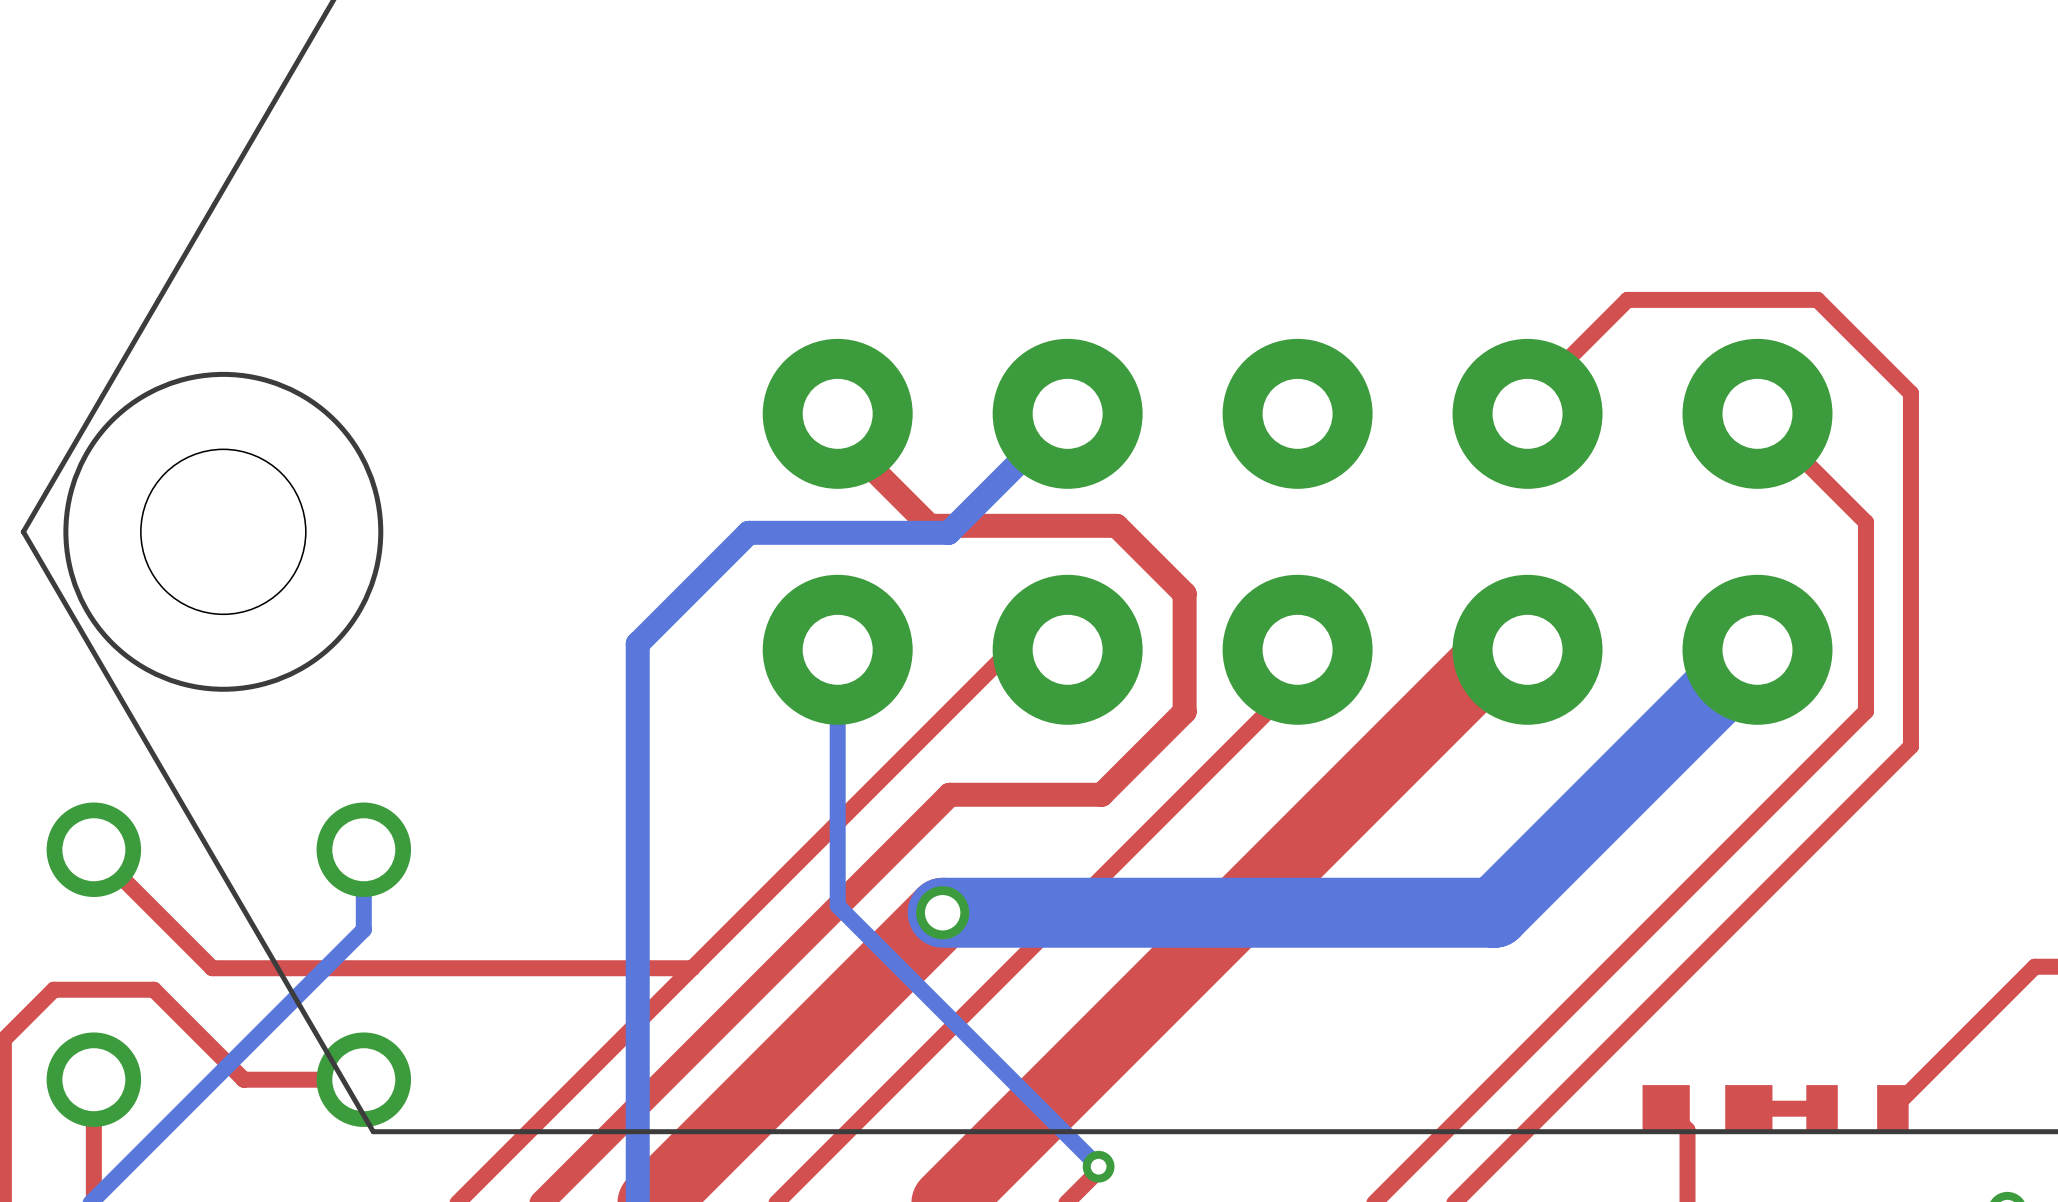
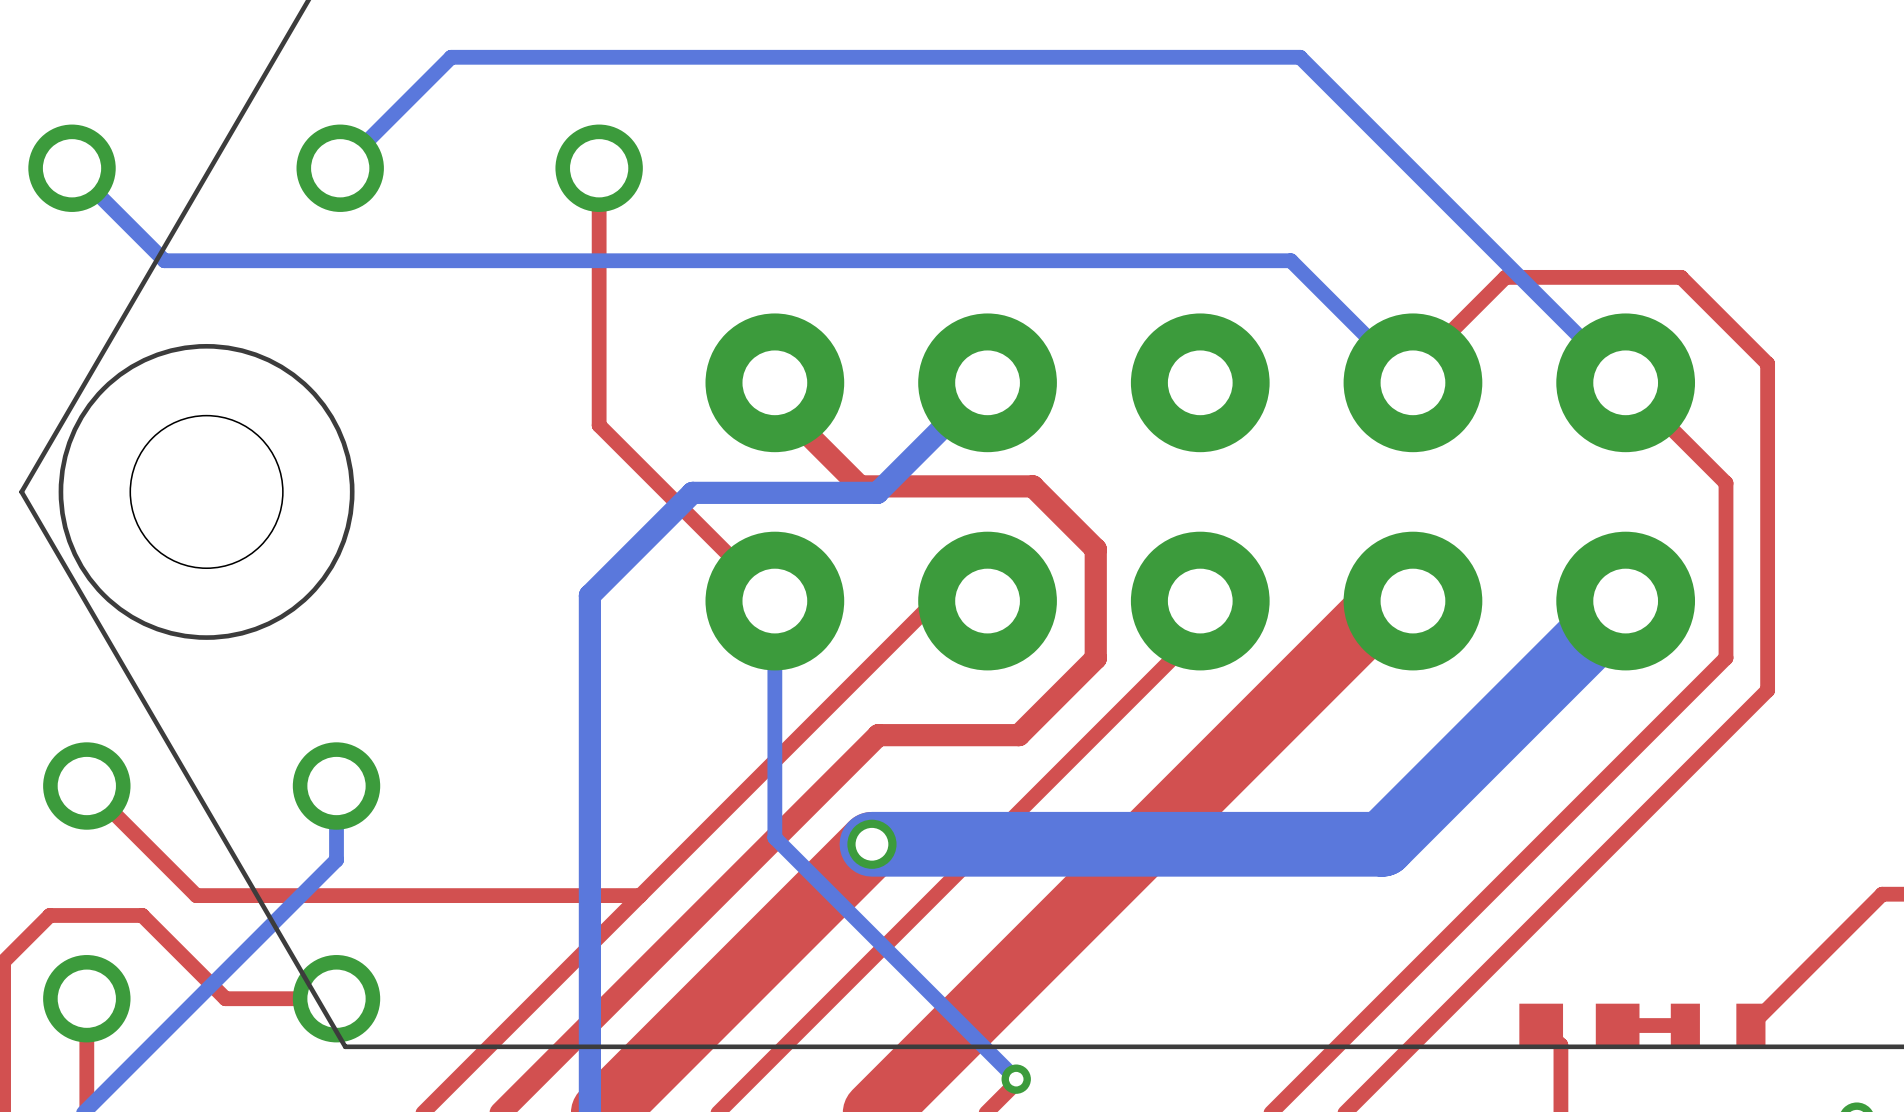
bottom track: none -> (72, 168) (164, 260) (1290, 260) (1412, 382)
part: none -> (72, 168)
bottom track: none -> (340, 168) (451, 57) (1300, 57) (1625, 382)
part: none -> (340, 168)
top track: none -> (599, 168) (599, 425) (774, 601)
part: none -> (599, 168)

